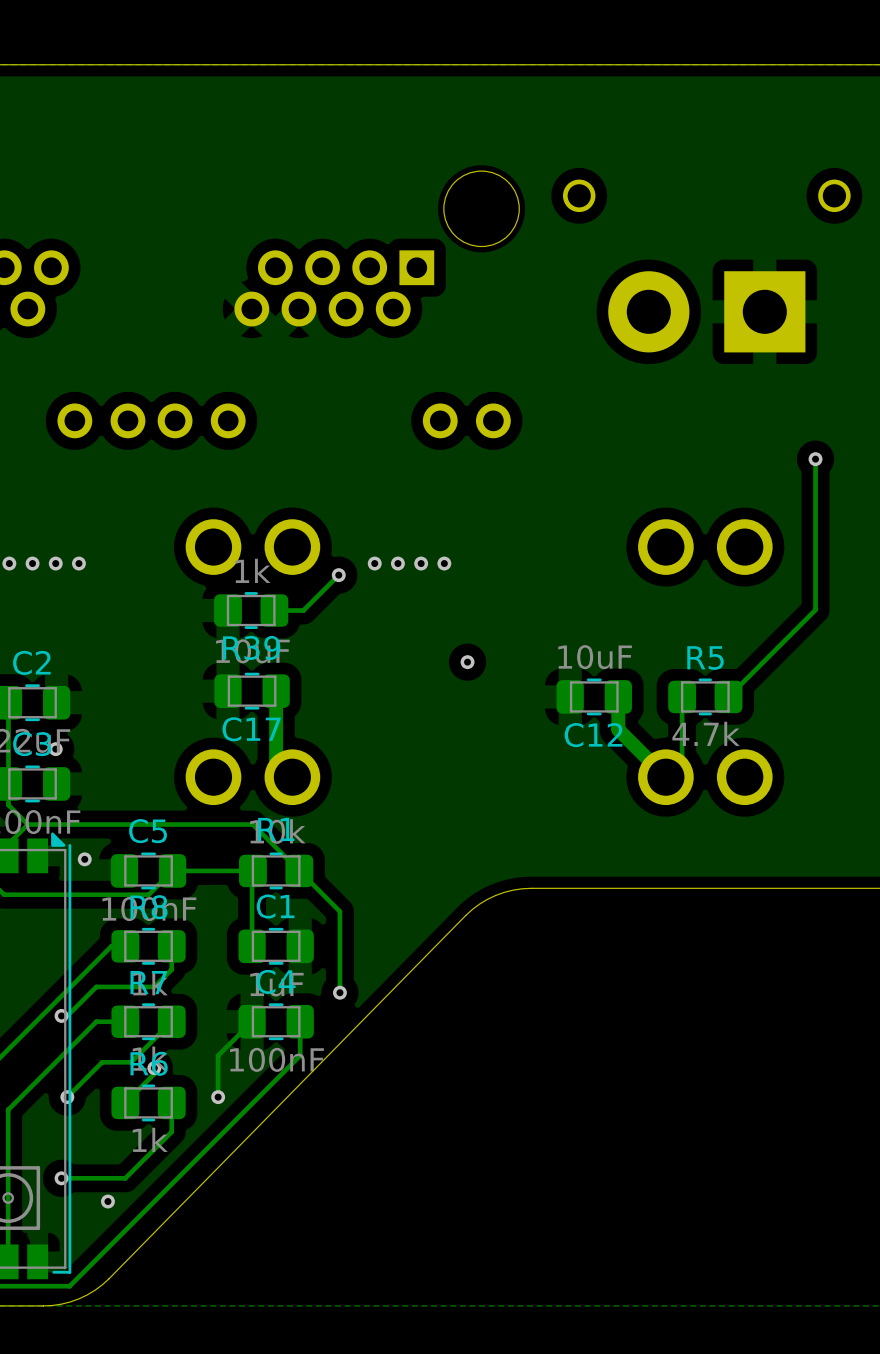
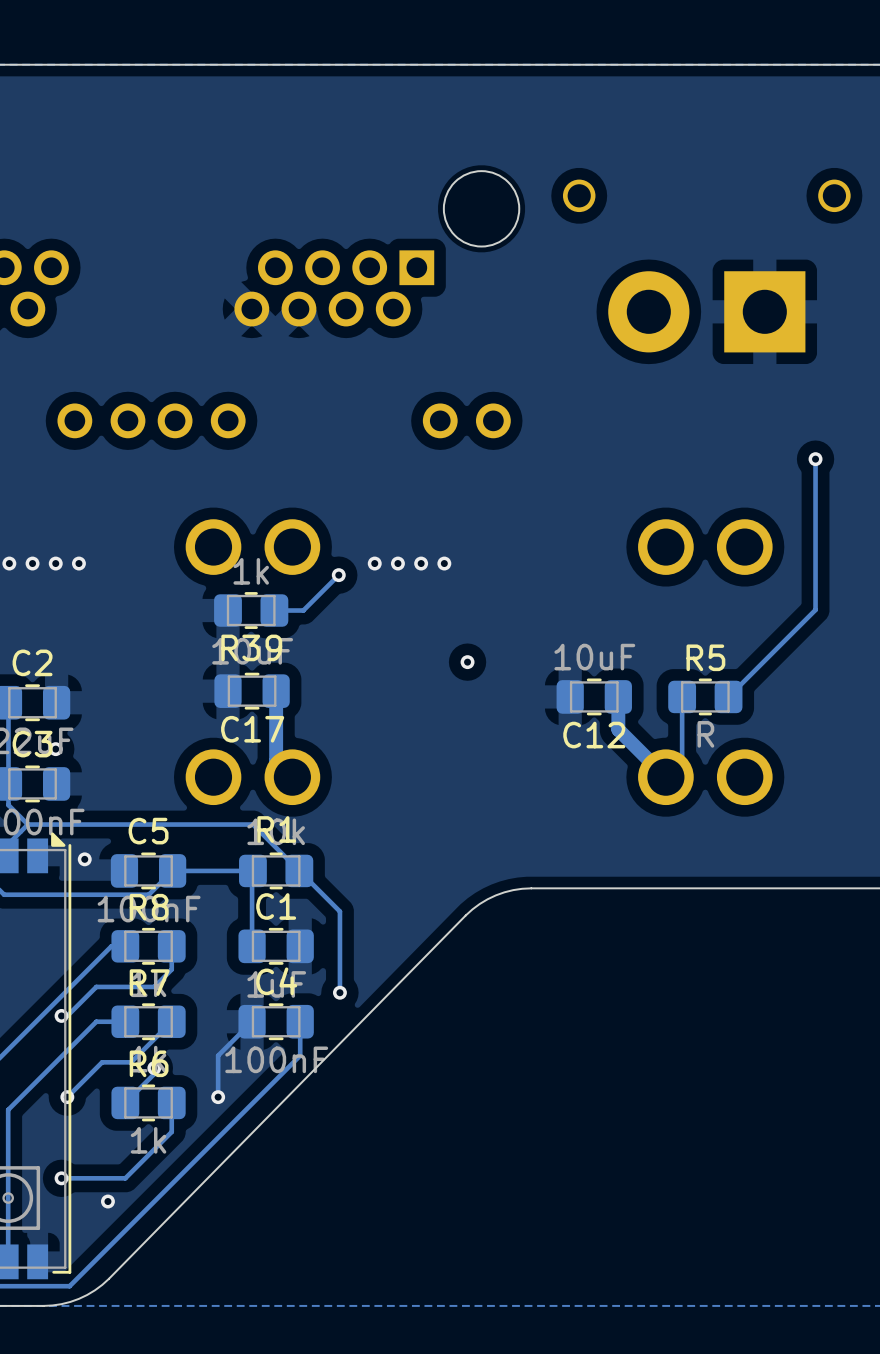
R5 value: 4.7k (706, 733) -> R (705, 734)

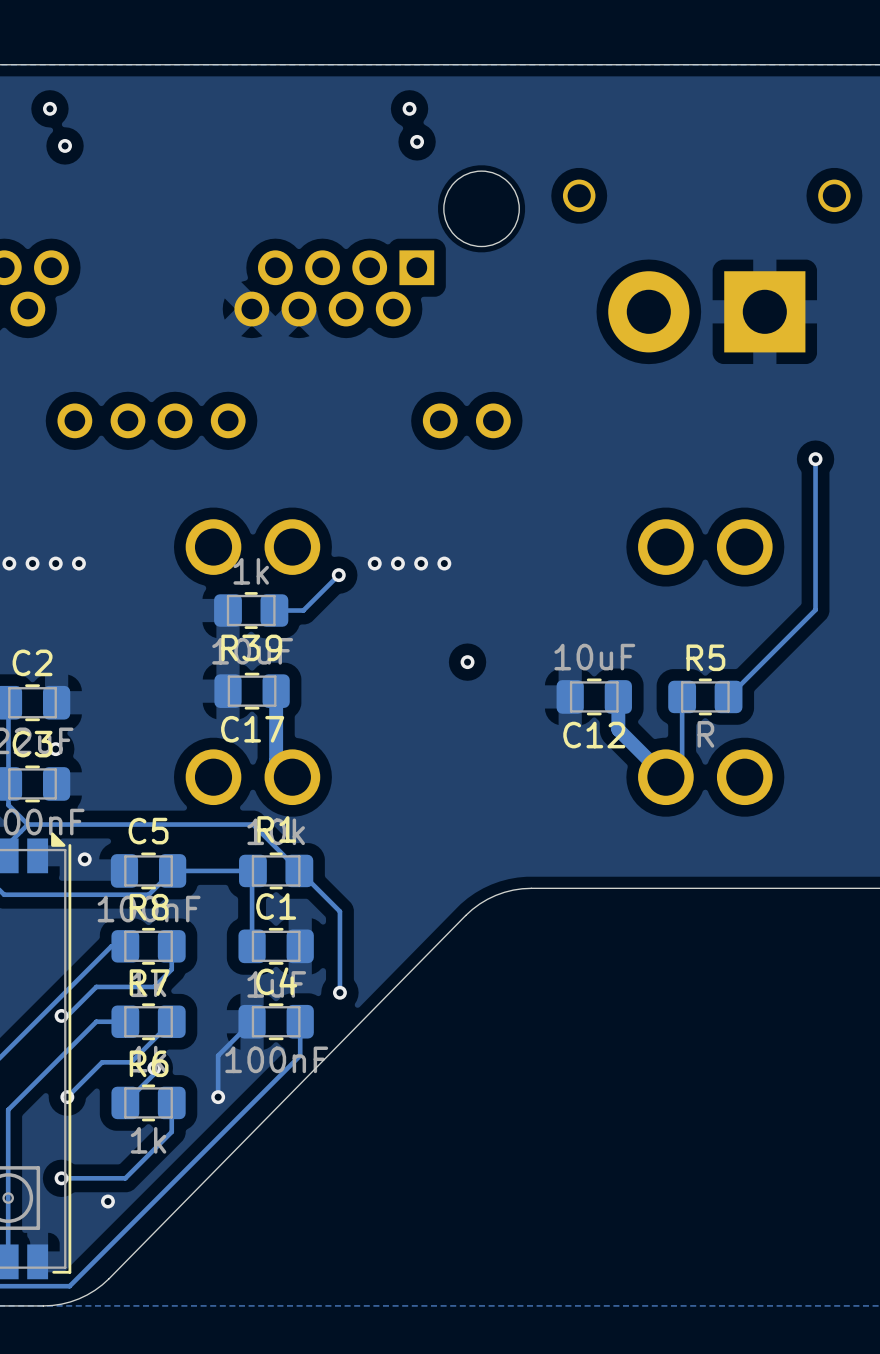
via: none -> (49, 108)
via: none -> (409, 108)
via: none -> (417, 141)
via: none -> (65, 145)

